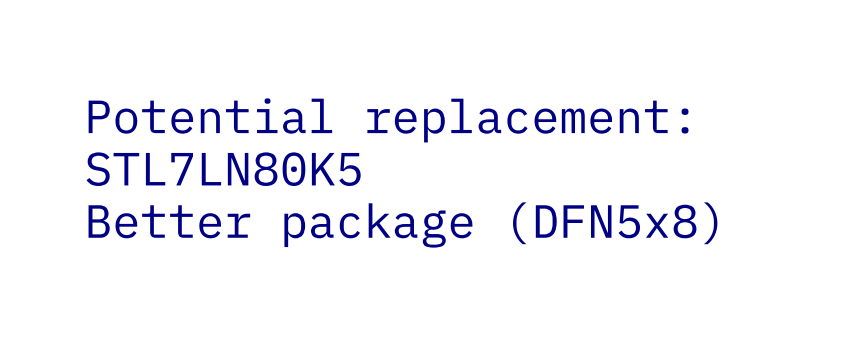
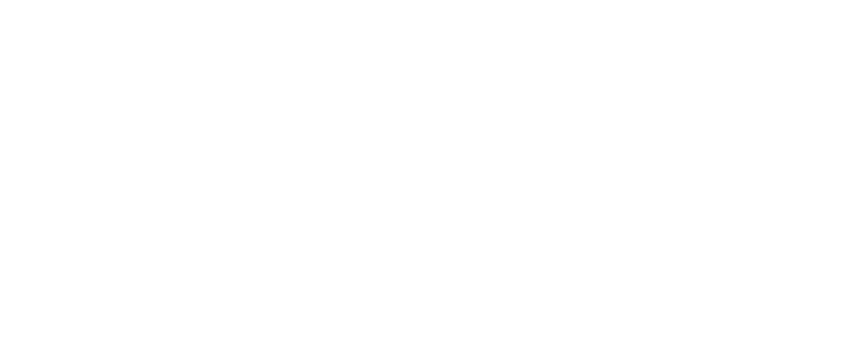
text: Potential replacement: (388, 120) -> none
text: STL7LN80K5 (223, 169) -> none
text: Better package (DFN5x8) (402, 225) -> none

